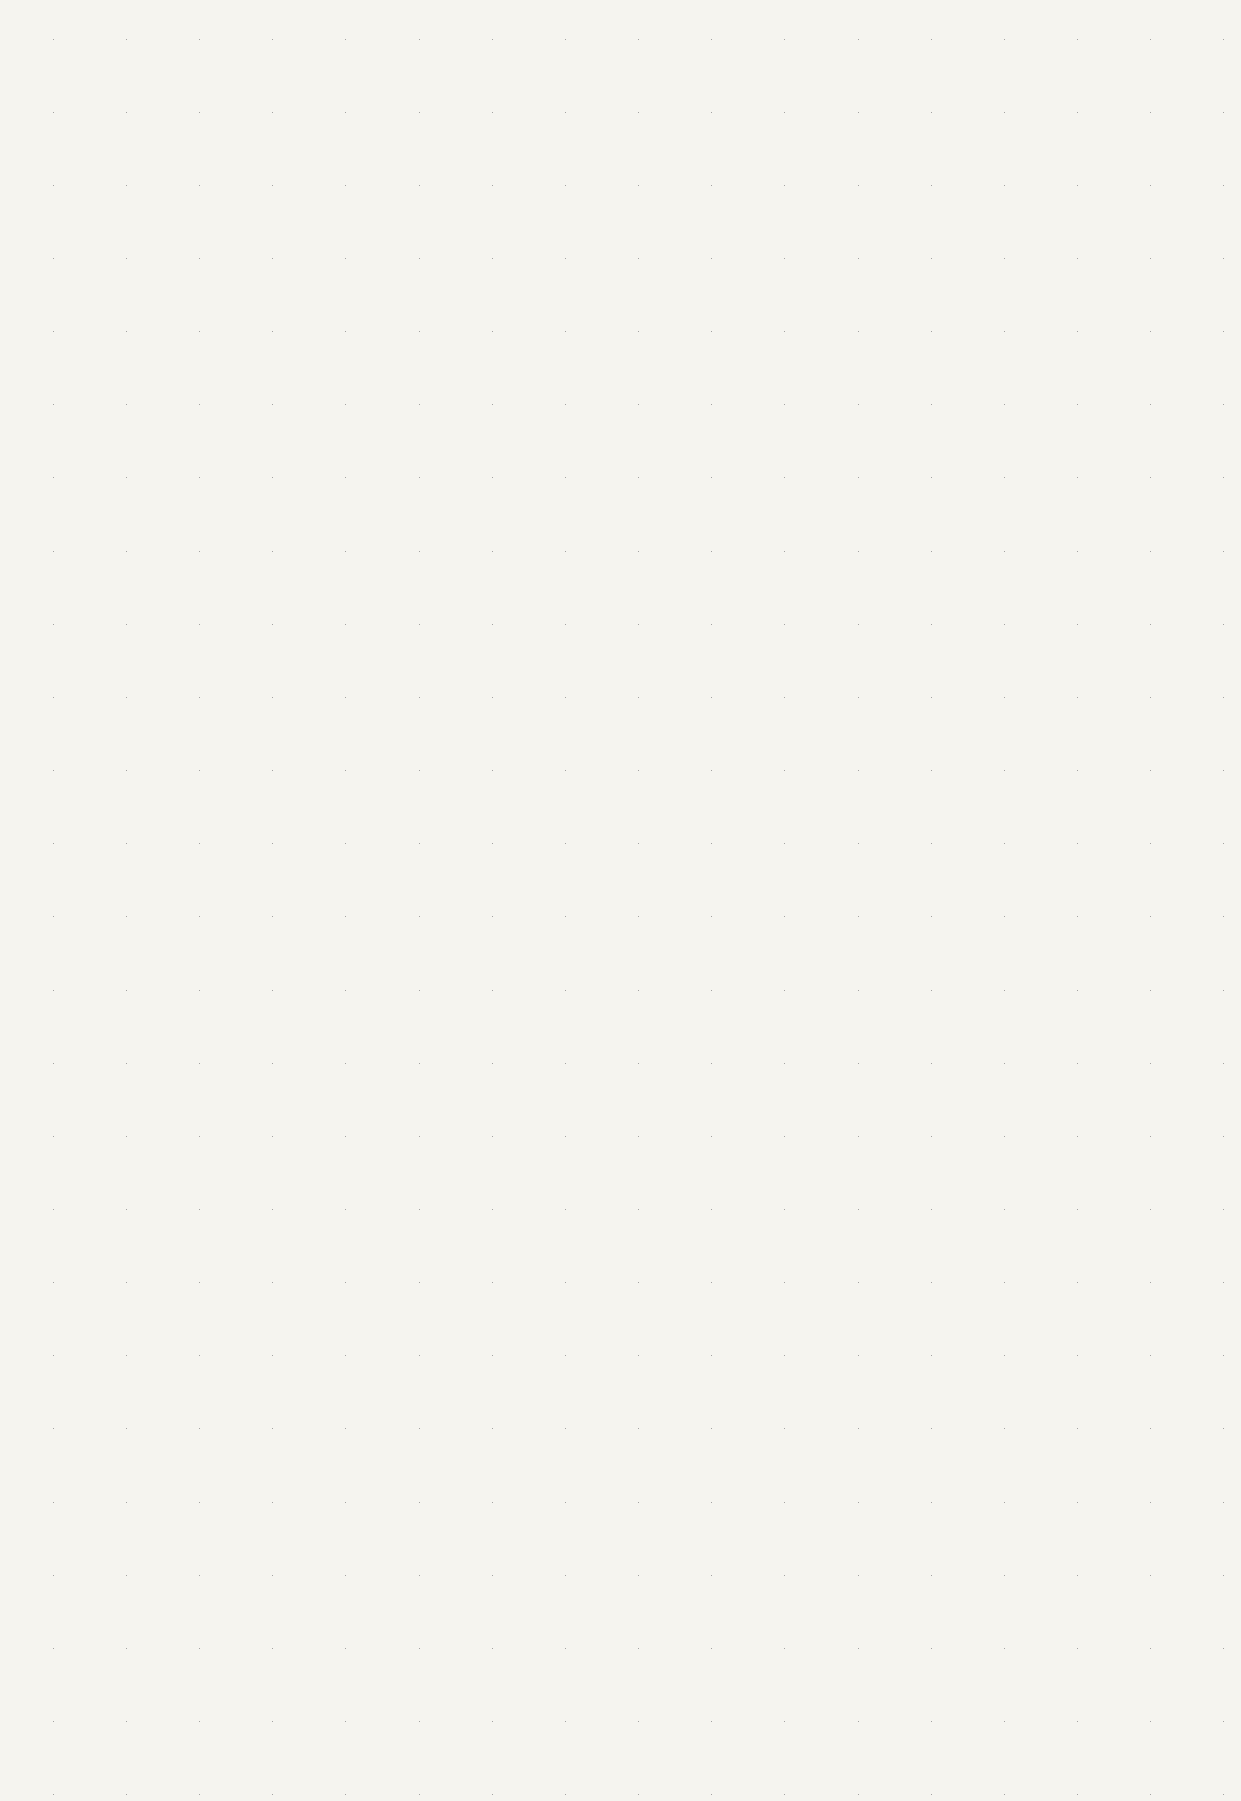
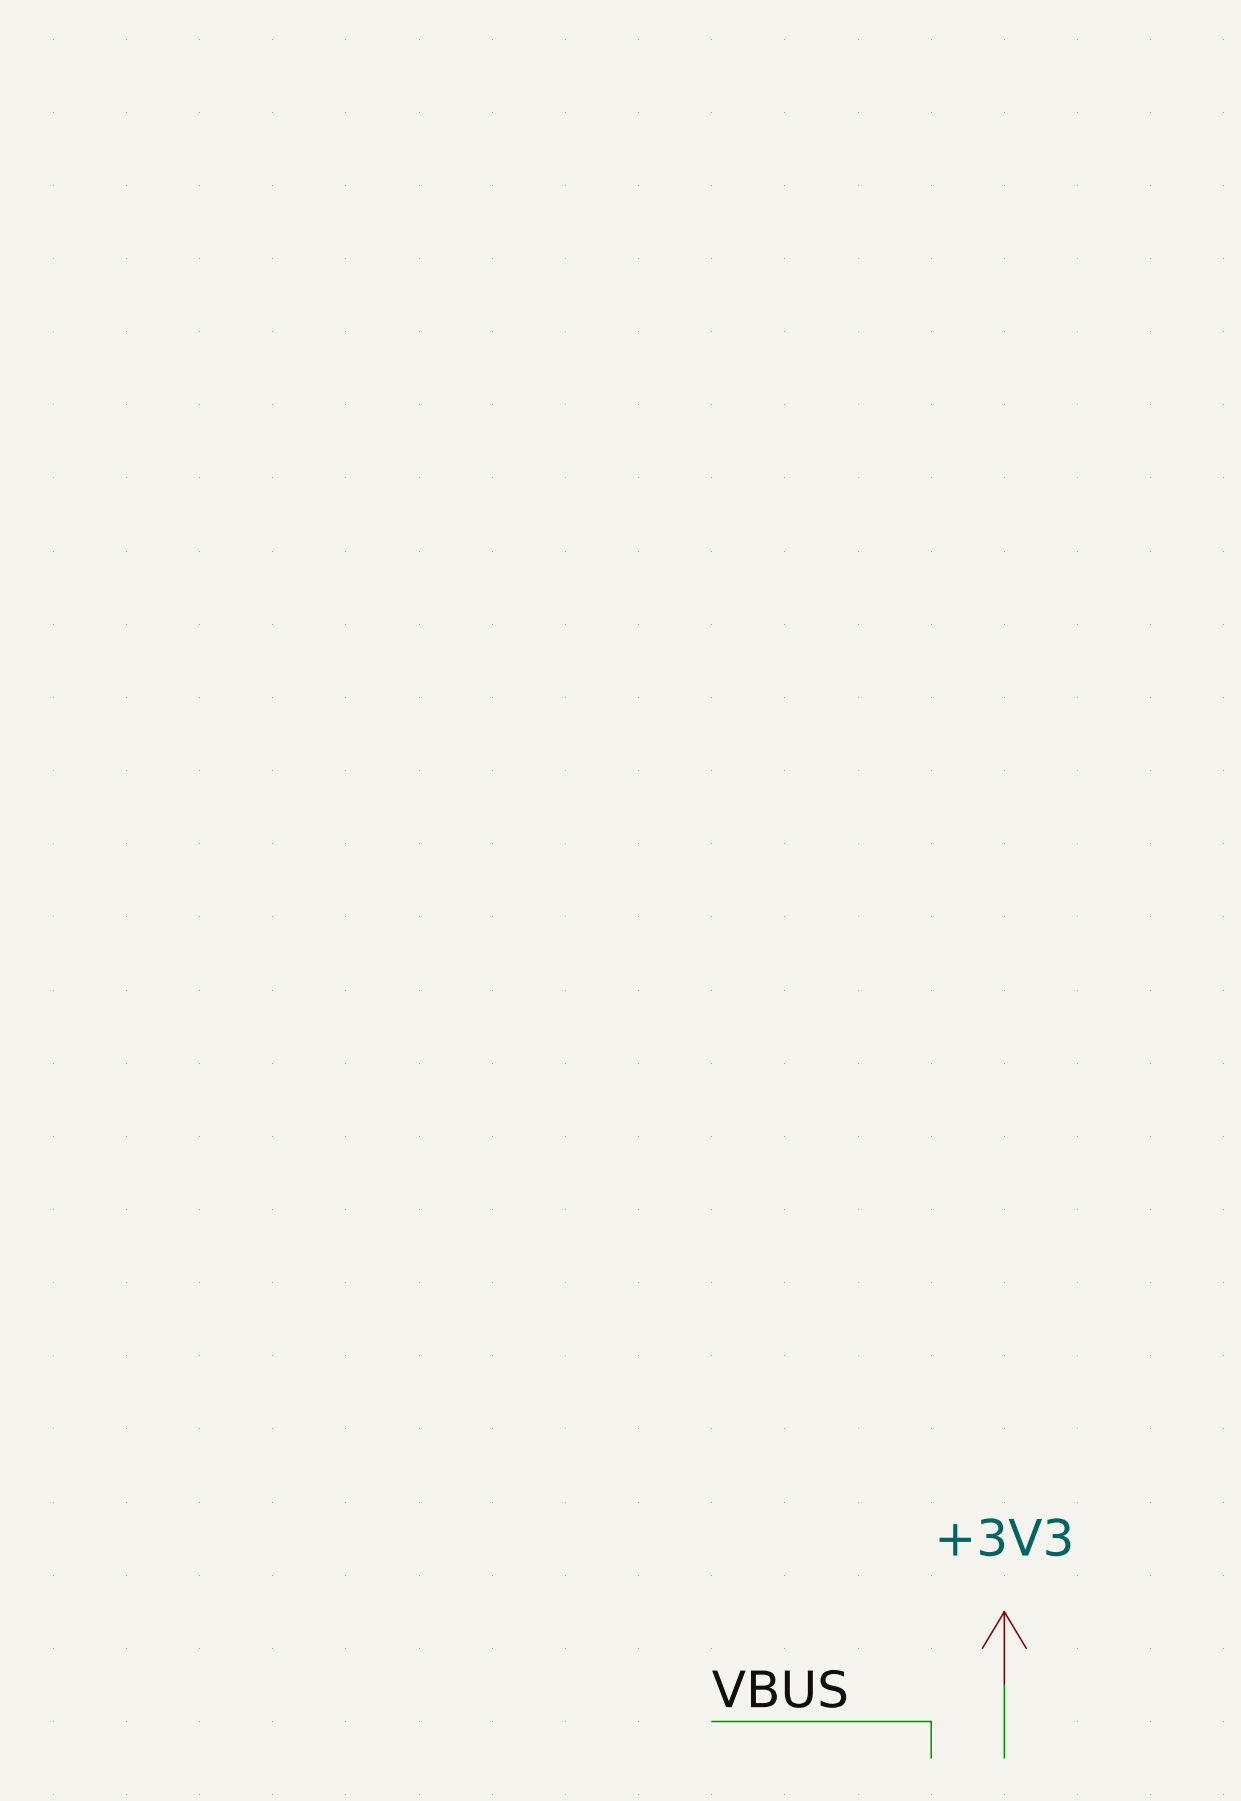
power symbol: none -> +3V3 (1004, 1648)
wire: none -> (1004, 1684) (1004, 1758)
label: none -> VBUS (779, 1688)
wire: none -> (711, 1721) (931, 1721) (931, 1758)

